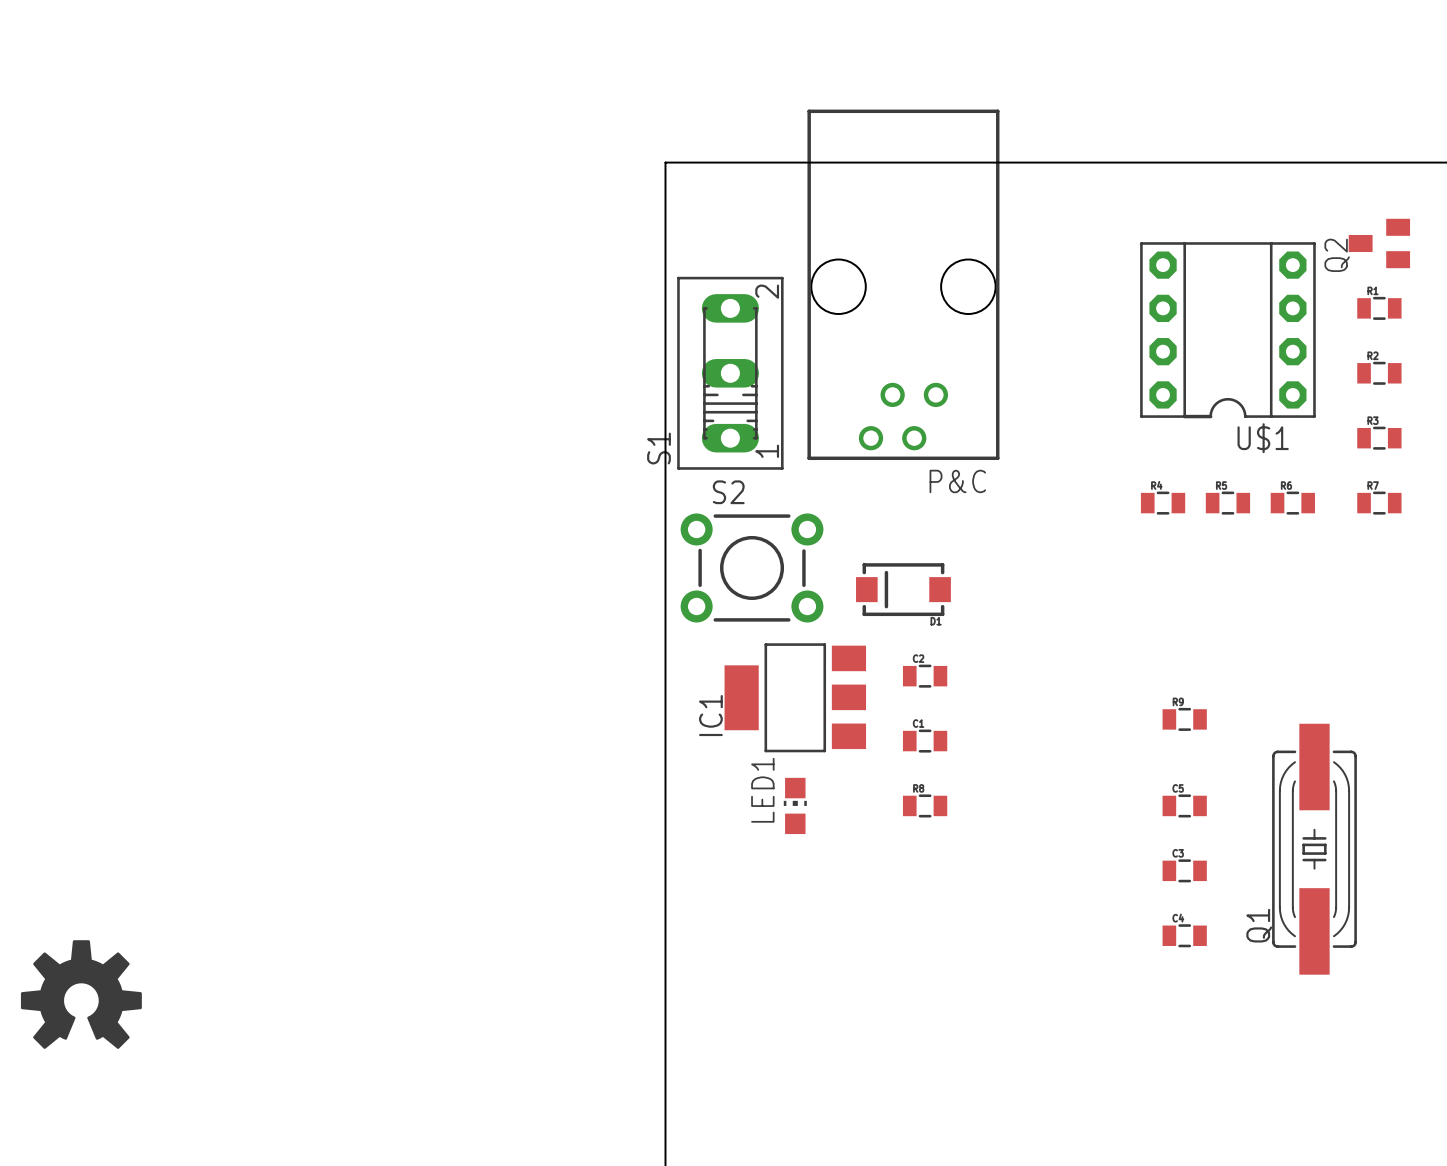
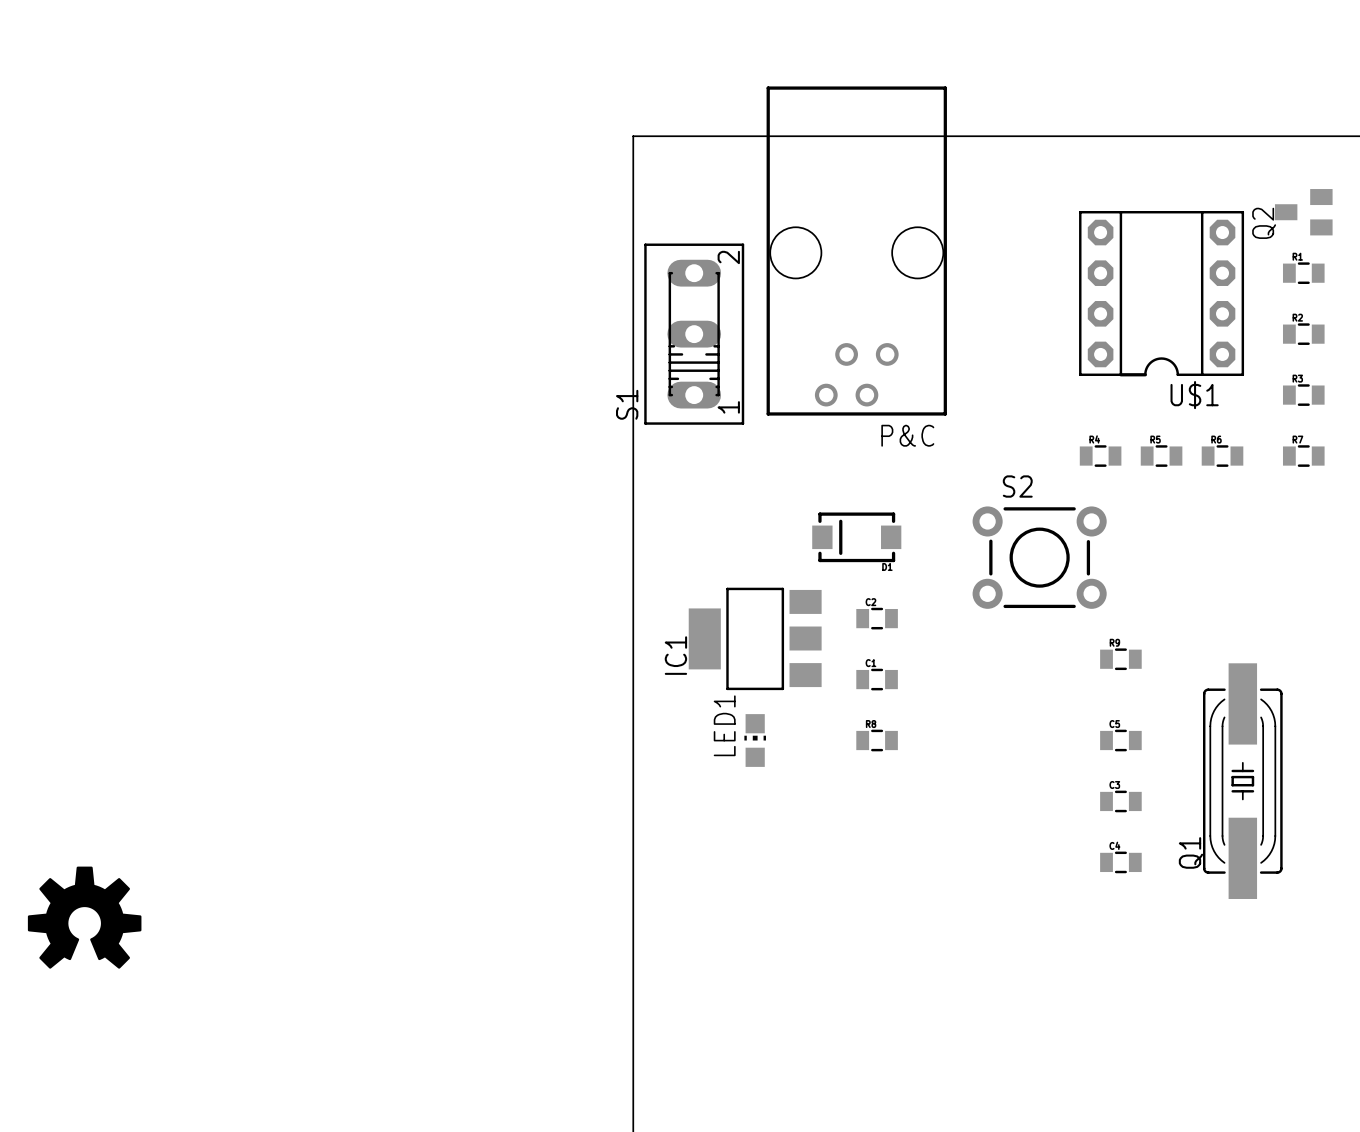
S2 position: (752, 567) -> (1039, 557)

